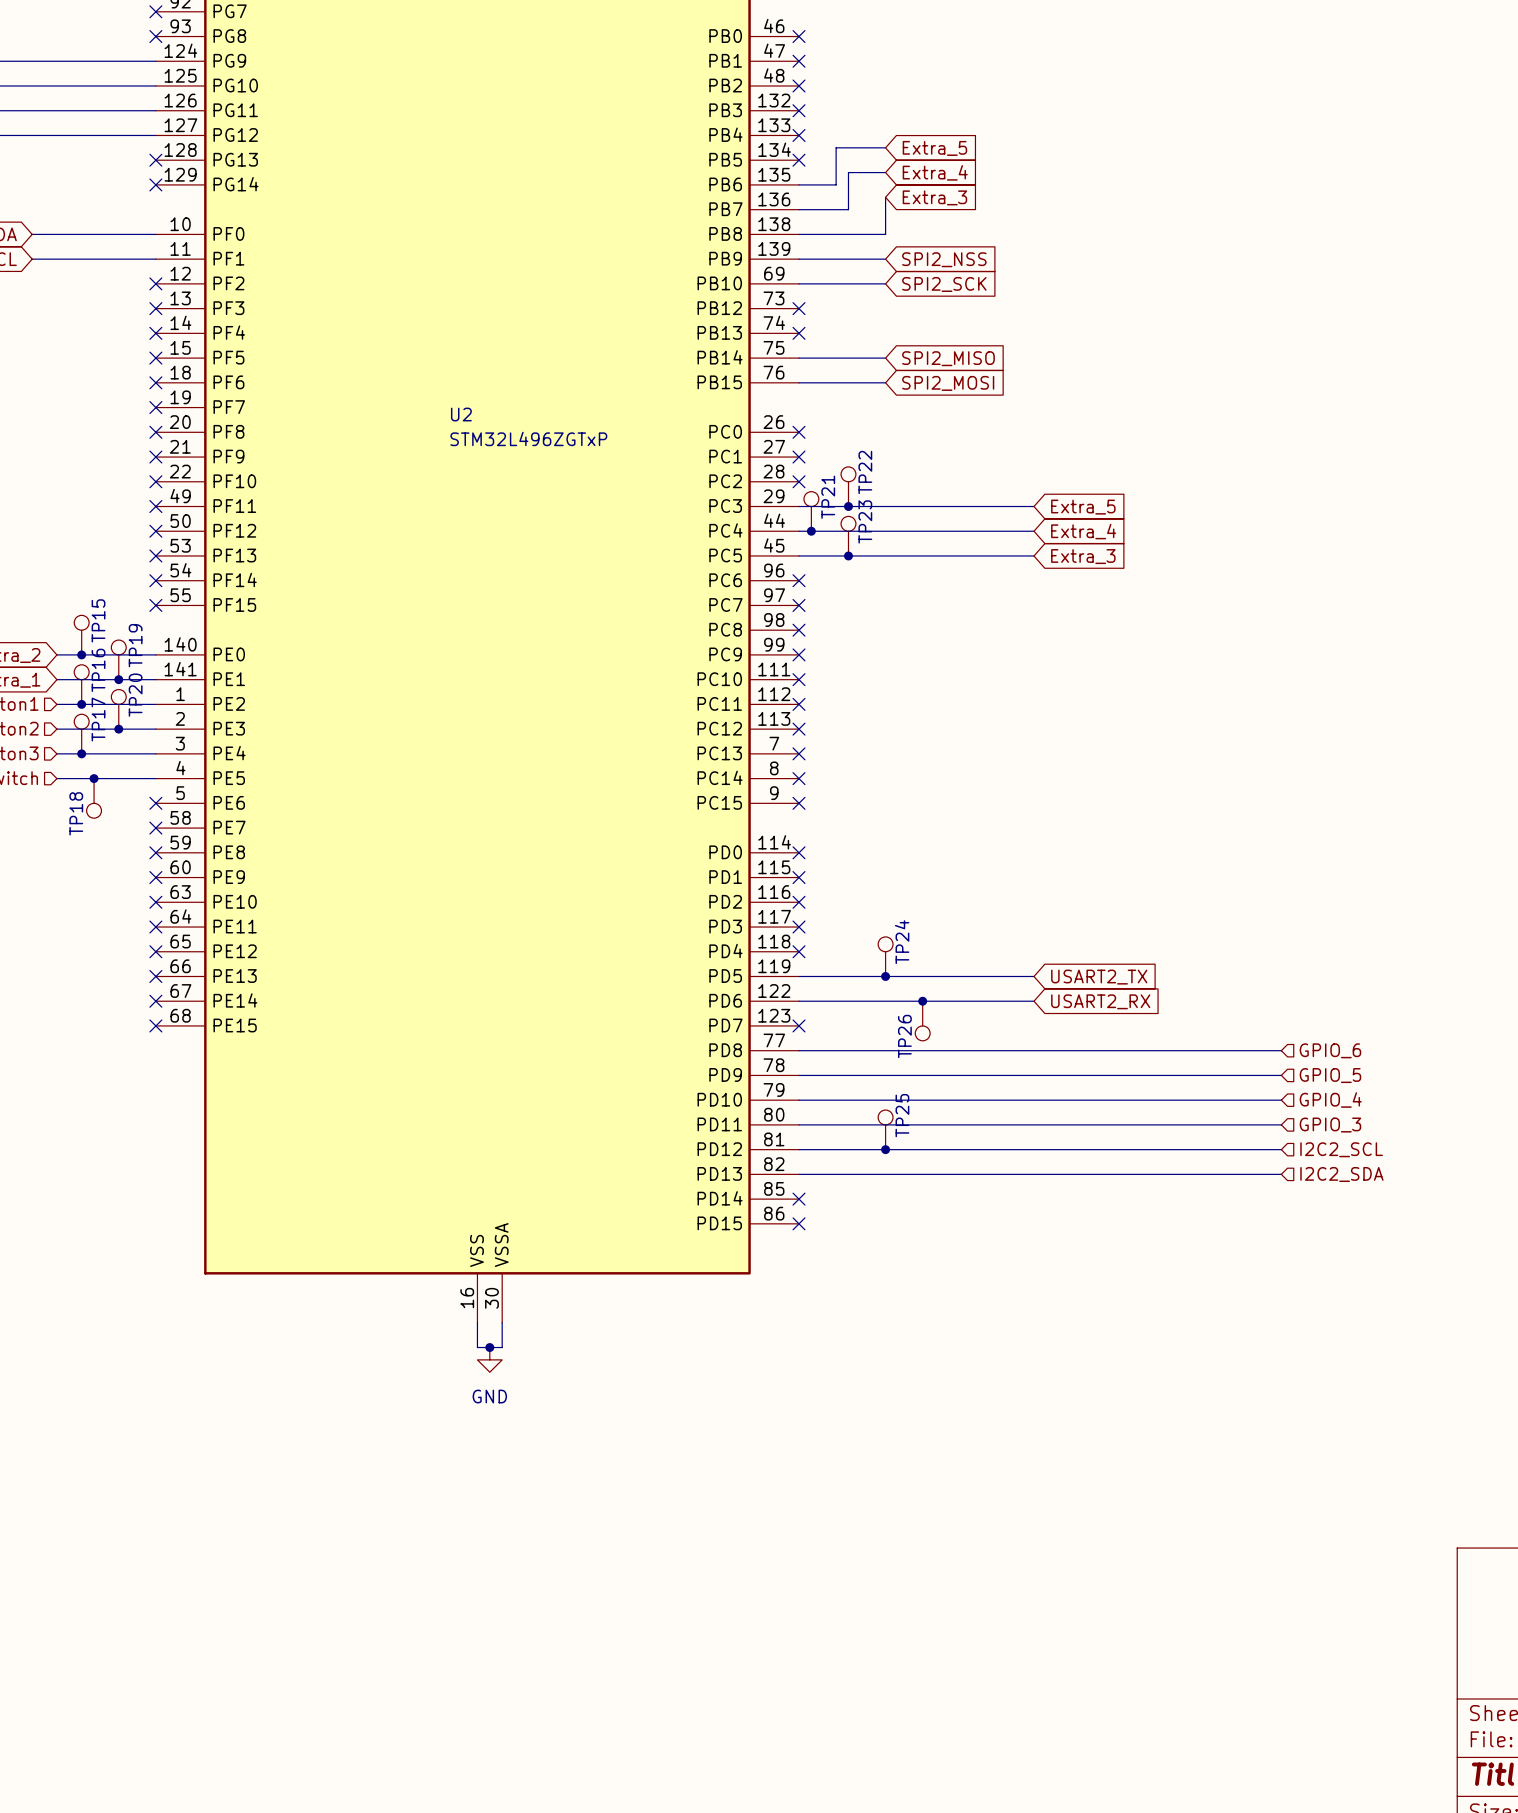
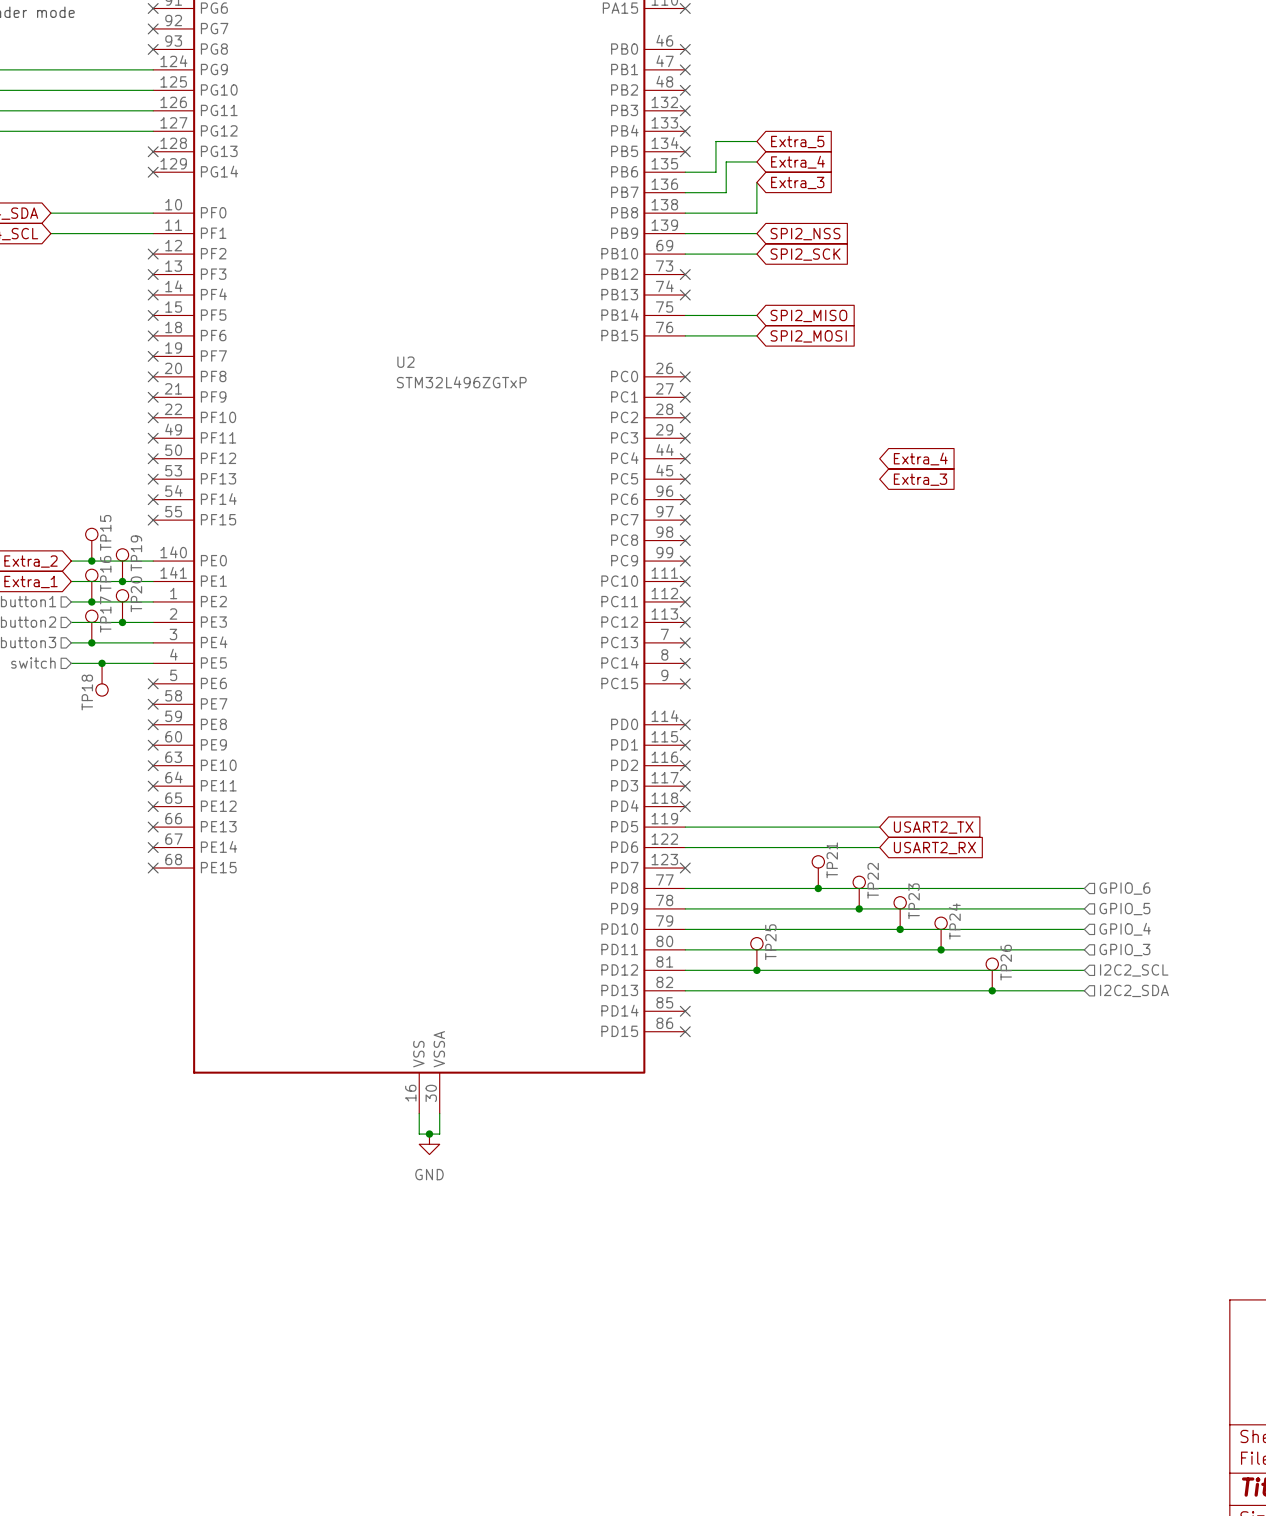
TP22 position: (848, 486) -> (859, 892)
wire: (799, 506) (1034, 506) -> none
no-connect mark: none -> (685, 438)
junction: (848, 506) -> none
global label: Extra_5 (1083, 507) -> none
TP21 position: (811, 511) -> (818, 872)
wire: (799, 531) (1034, 531) -> none
no-connect mark: none -> (685, 458)
junction: (811, 531) -> none
TP23 position: (848, 536) -> (900, 913)
wire: (799, 555) (1034, 555) -> none
no-connect mark: none -> (685, 479)
junction: (848, 555) -> none
TP24 position: (885, 956) -> (941, 933)
junction: (885, 976) -> none
junction: (922, 1001) -> none
TP26 position: (922, 1021) -> (992, 974)
TP26 rotation: 0° (922, 1033) -> 180° (992, 964)
junction: none -> (818, 888)
junction: none -> (859, 908)
junction: none -> (900, 929)
junction: none -> (941, 949)
junction: none -> (992, 990)

